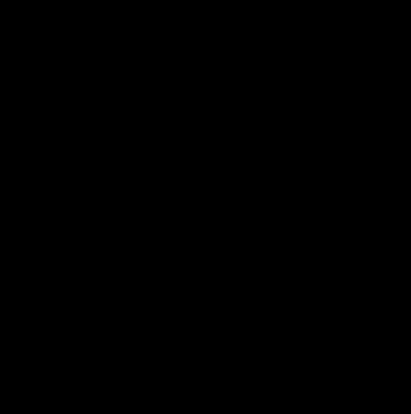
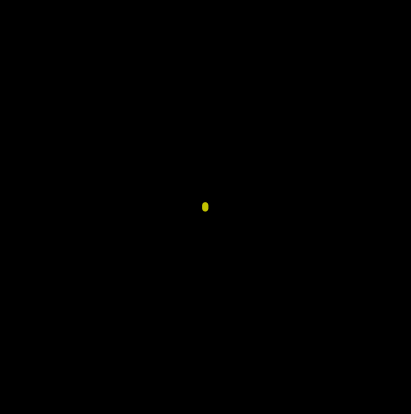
board edge: none -> (205, 205) (205, 208)

